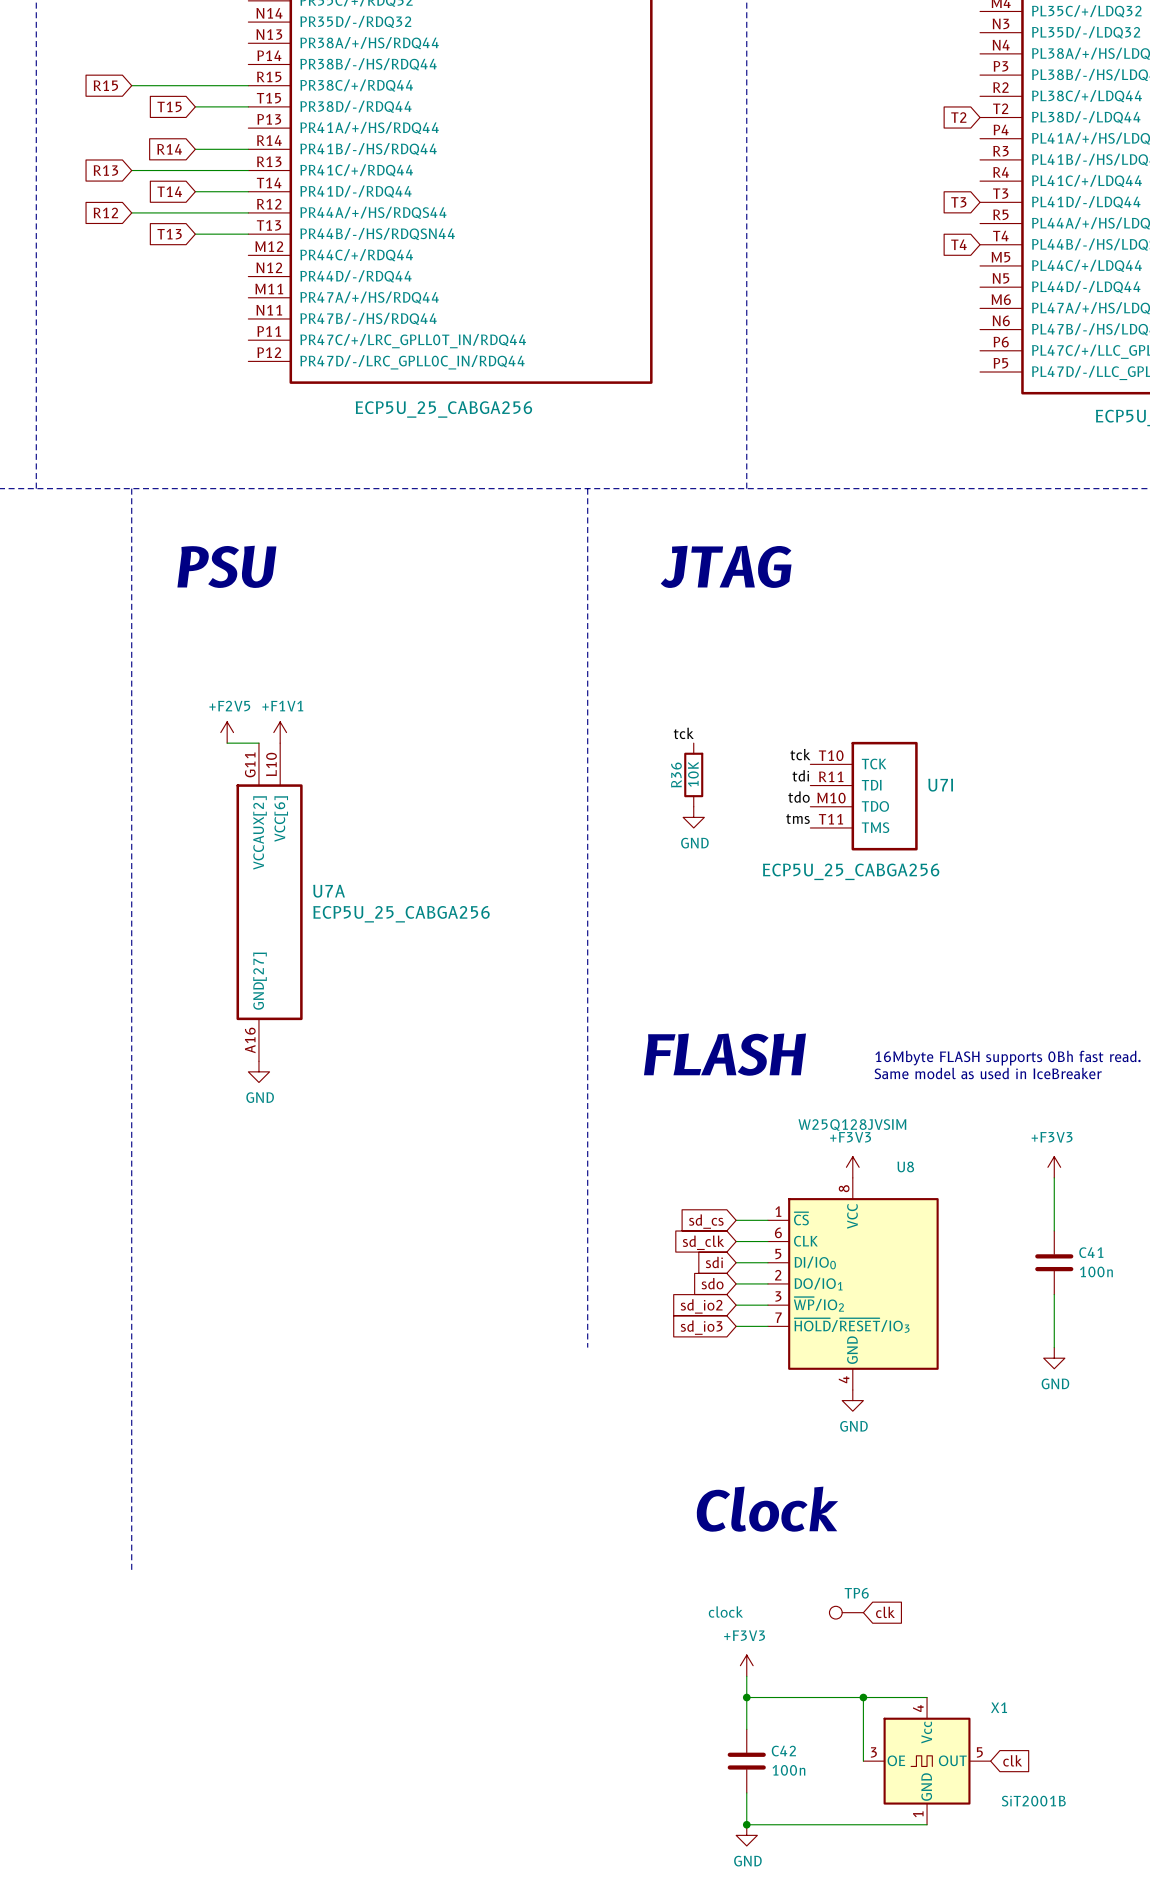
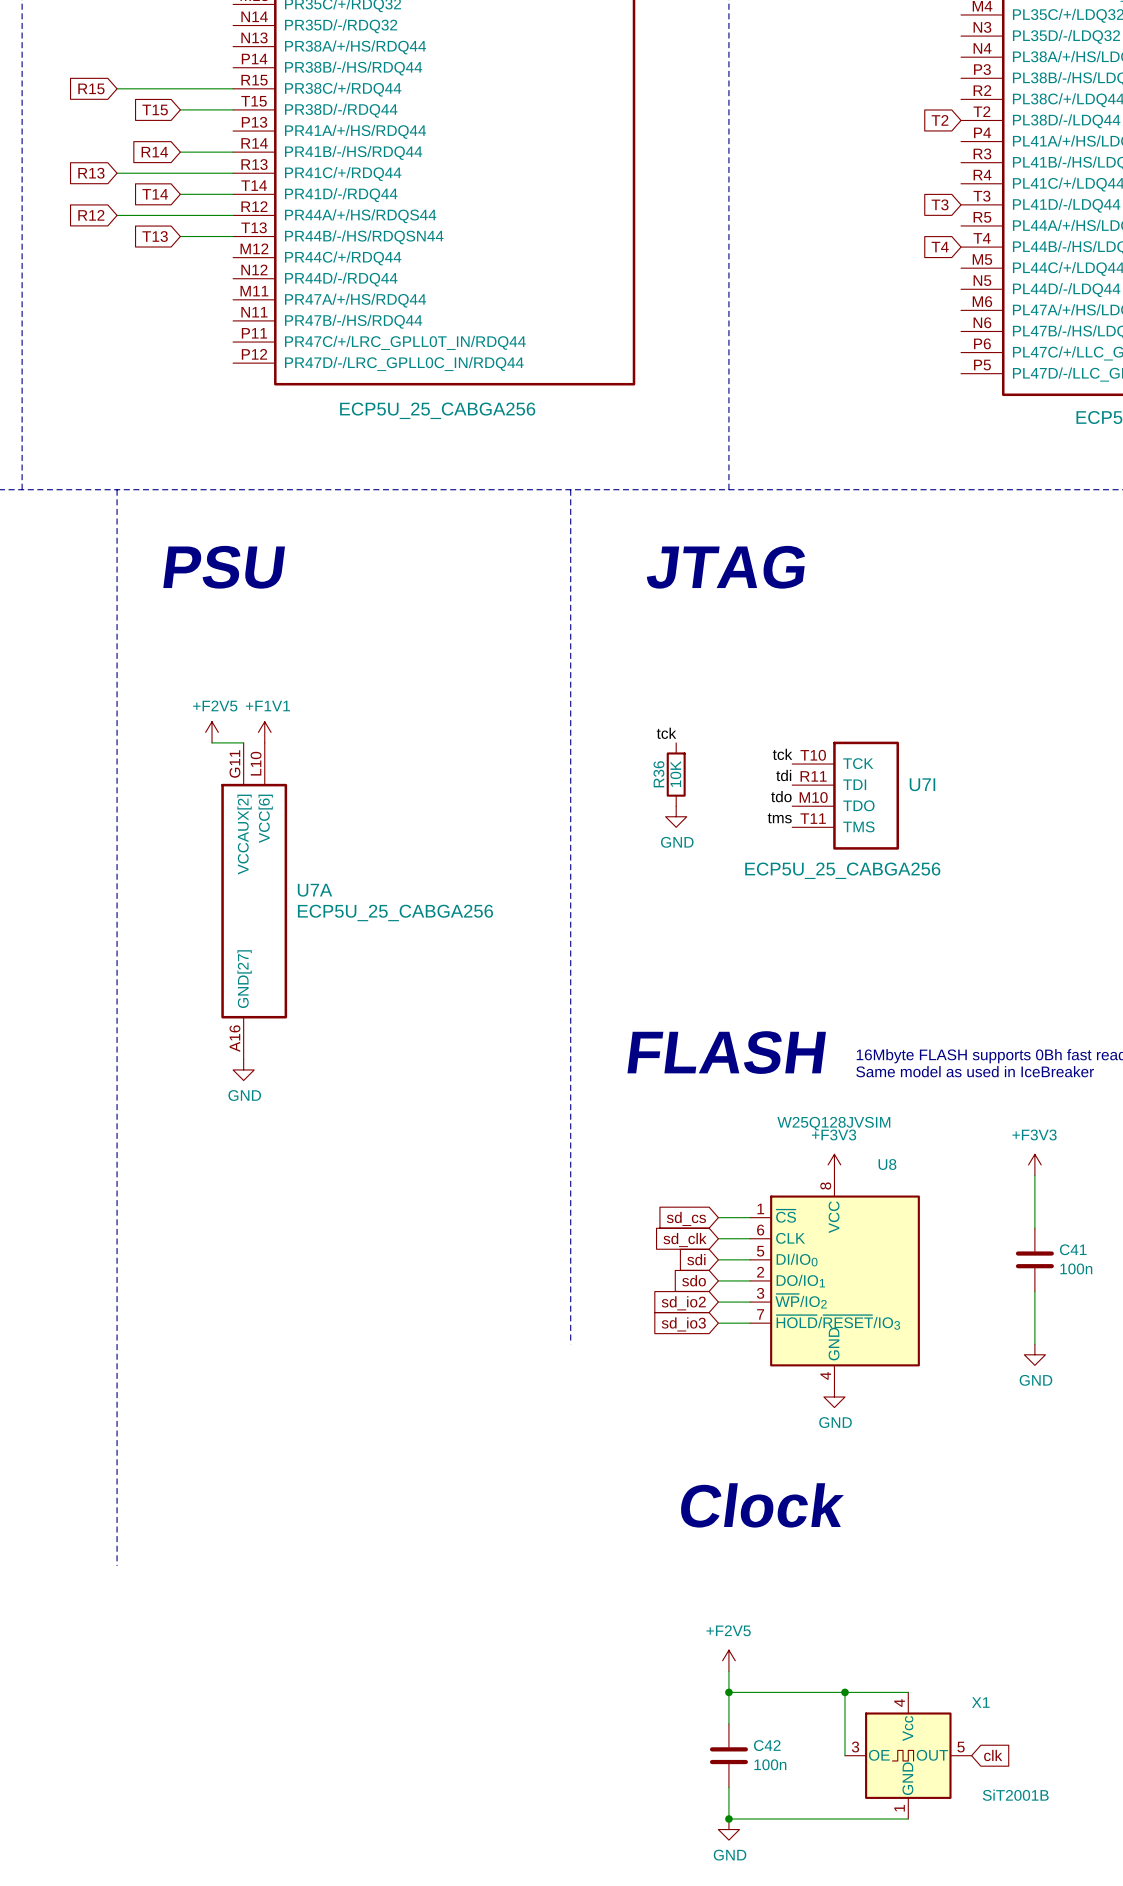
TP6: clock (846, 1612) -> none
global label: clk (885, 1612) -> none
power symbol: +F3V3 (746, 1665) -> +F2V5 (728, 1660)

